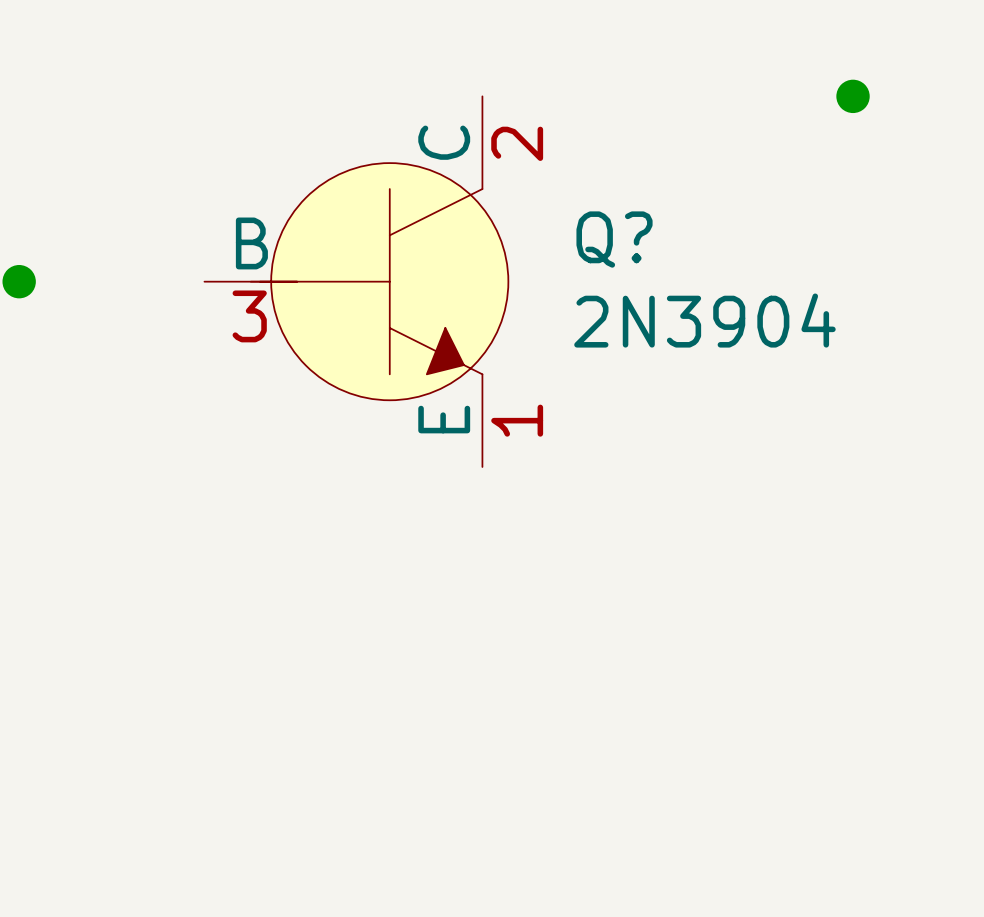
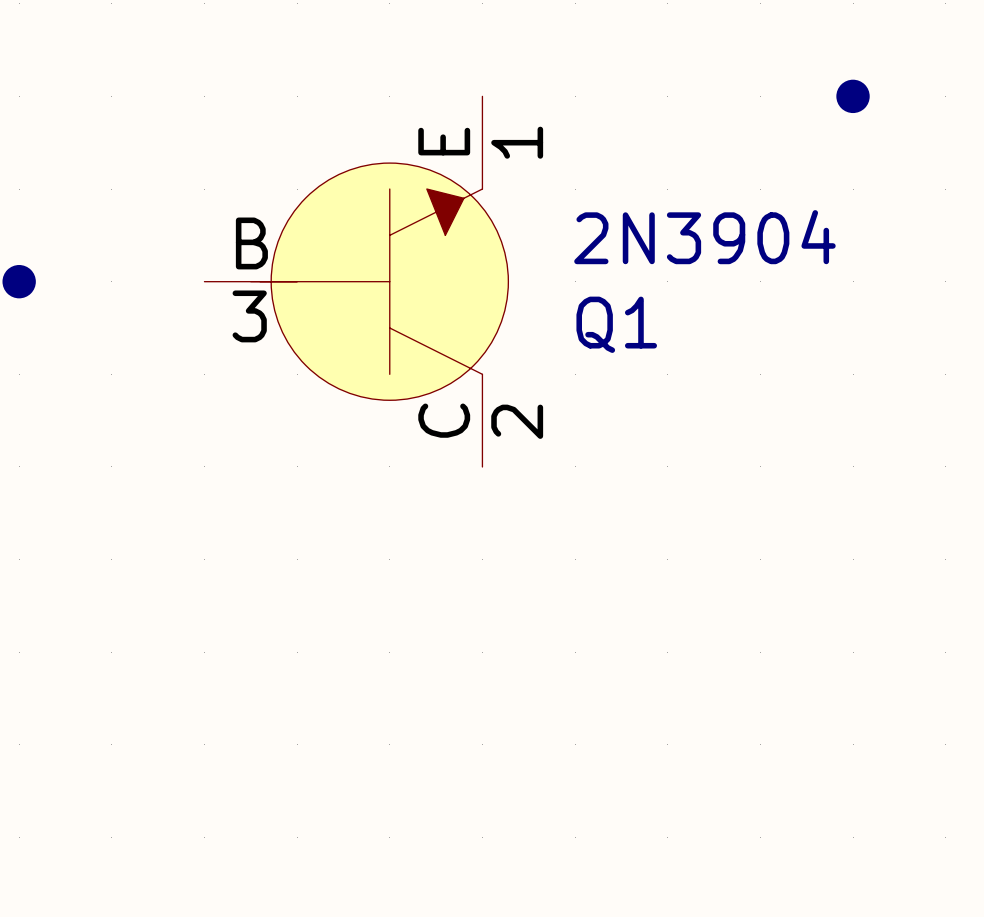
Q?: 2N3904 (356, 281) -> none
Q1: none -> 2N3904 (356, 281)

